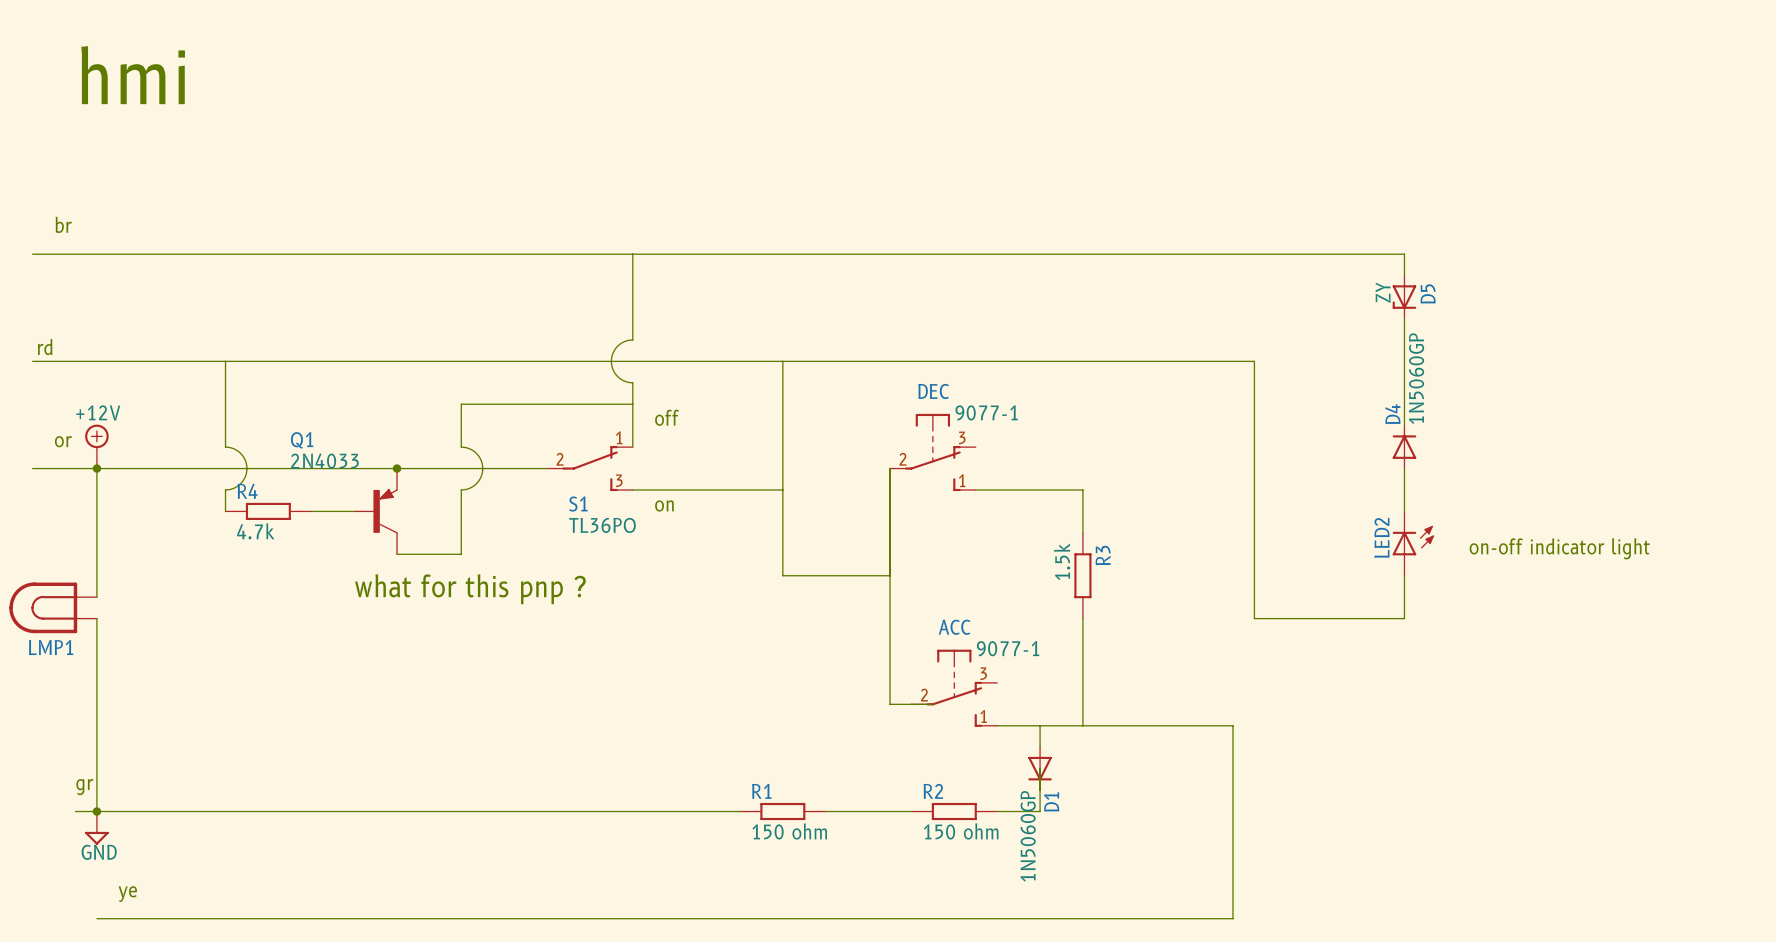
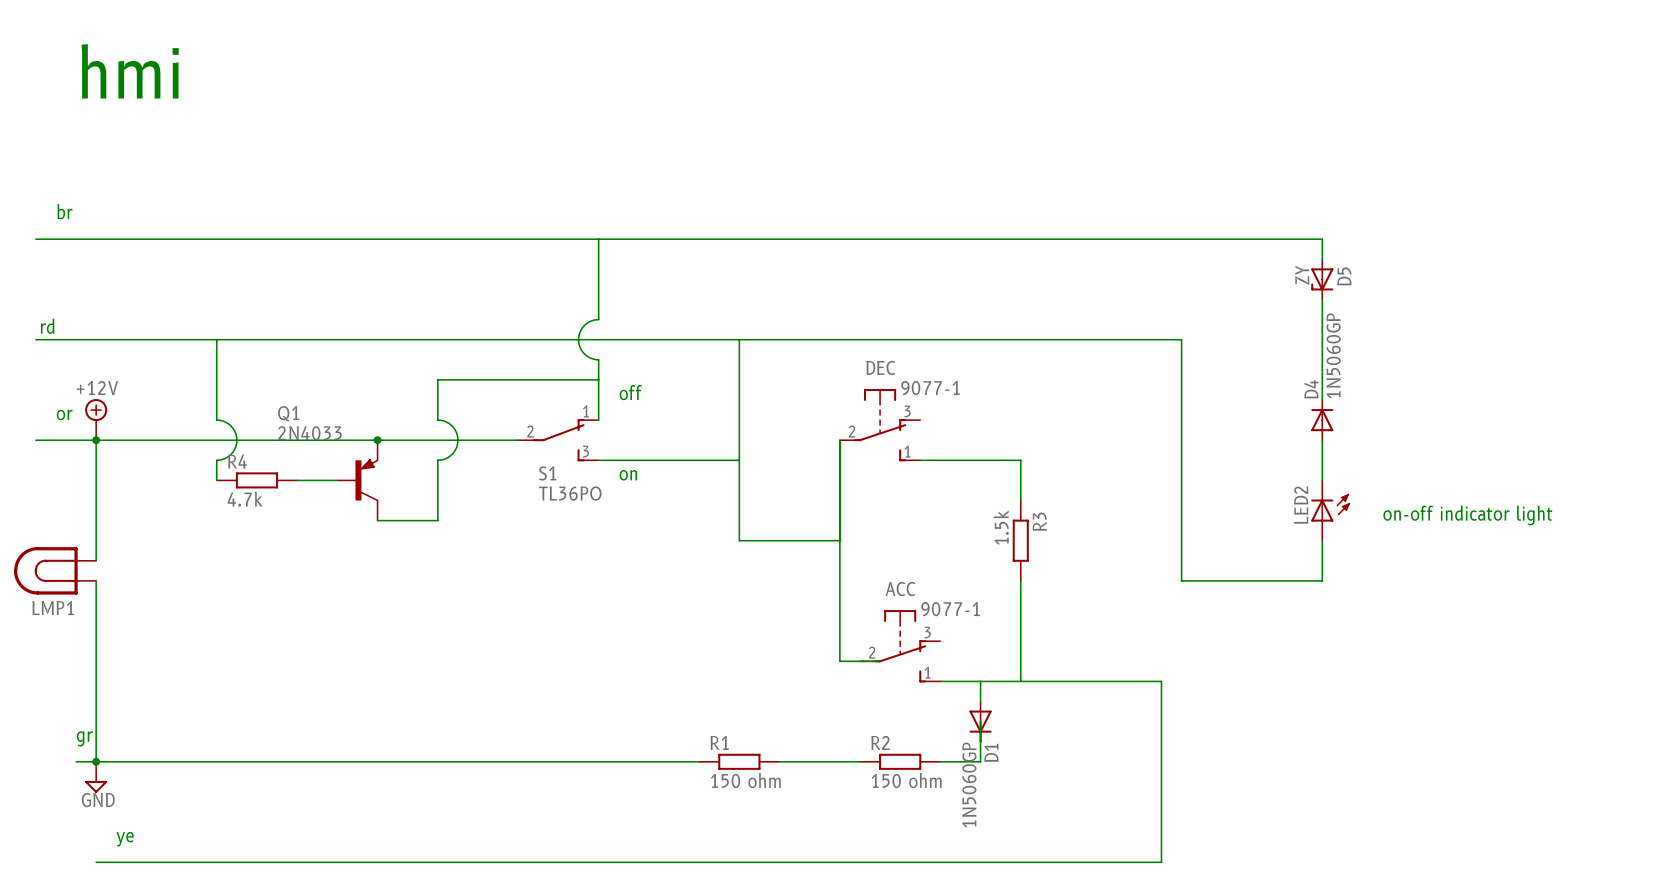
text: what for this pnp ? (470, 589) -> none

